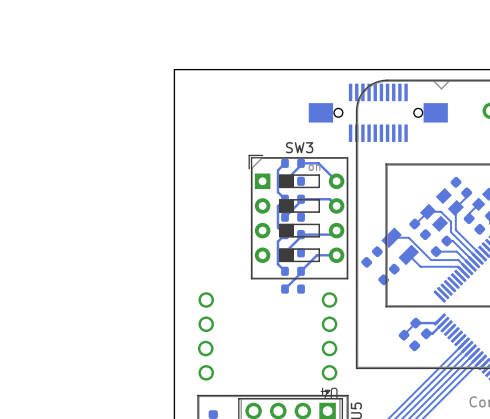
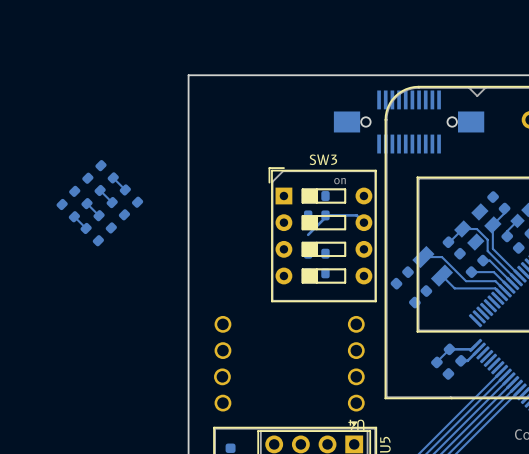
part: none -> (107, 171)
bottom track: (285, 163) (277, 170) (277, 192) (285, 199) (277, 206) (277, 227) (284, 234) (277, 241) (277, 264) (284, 271) -> none
part: (293, 163) -> none
bottom track: none -> (113, 177) (125, 189)
part: none -> (93, 184)
bottom track: none -> (100, 190) (112, 202)
part: none -> (131, 196)
bottom track: (285, 181) (301, 163) (318, 163) (336, 181) -> none
part: none -> (80, 197)
bottom track: none -> (86, 203) (99, 215)
part: none -> (118, 208)
part: none -> (68, 210)
bottom track: none -> (74, 216) (86, 228)
part: none -> (105, 221)
part: none -> (92, 234)
part: (293, 217) -> none
bottom track: (336, 230) (332, 234) (301, 234) (284, 252) -> none
bottom track: (336, 255) (317, 255) (285, 289) -> none
part: (293, 271) -> none
part: (293, 289) -> none

